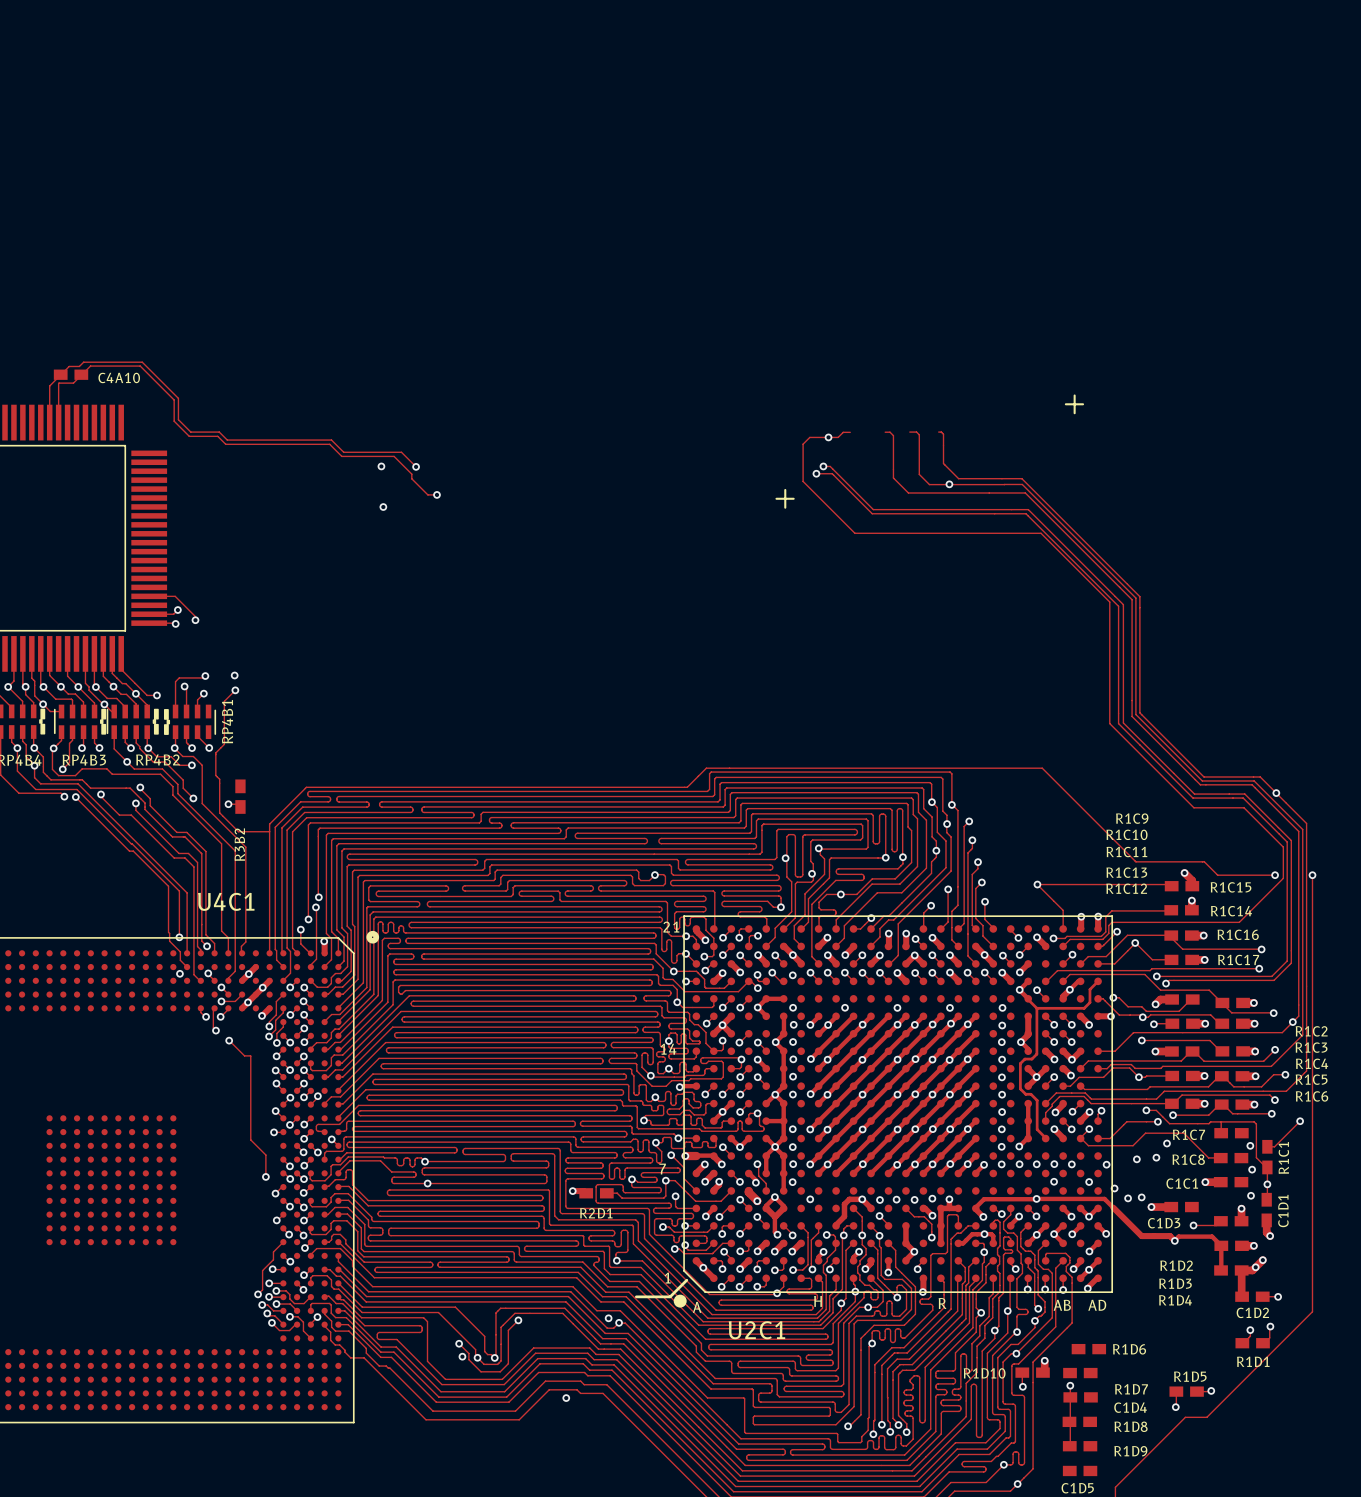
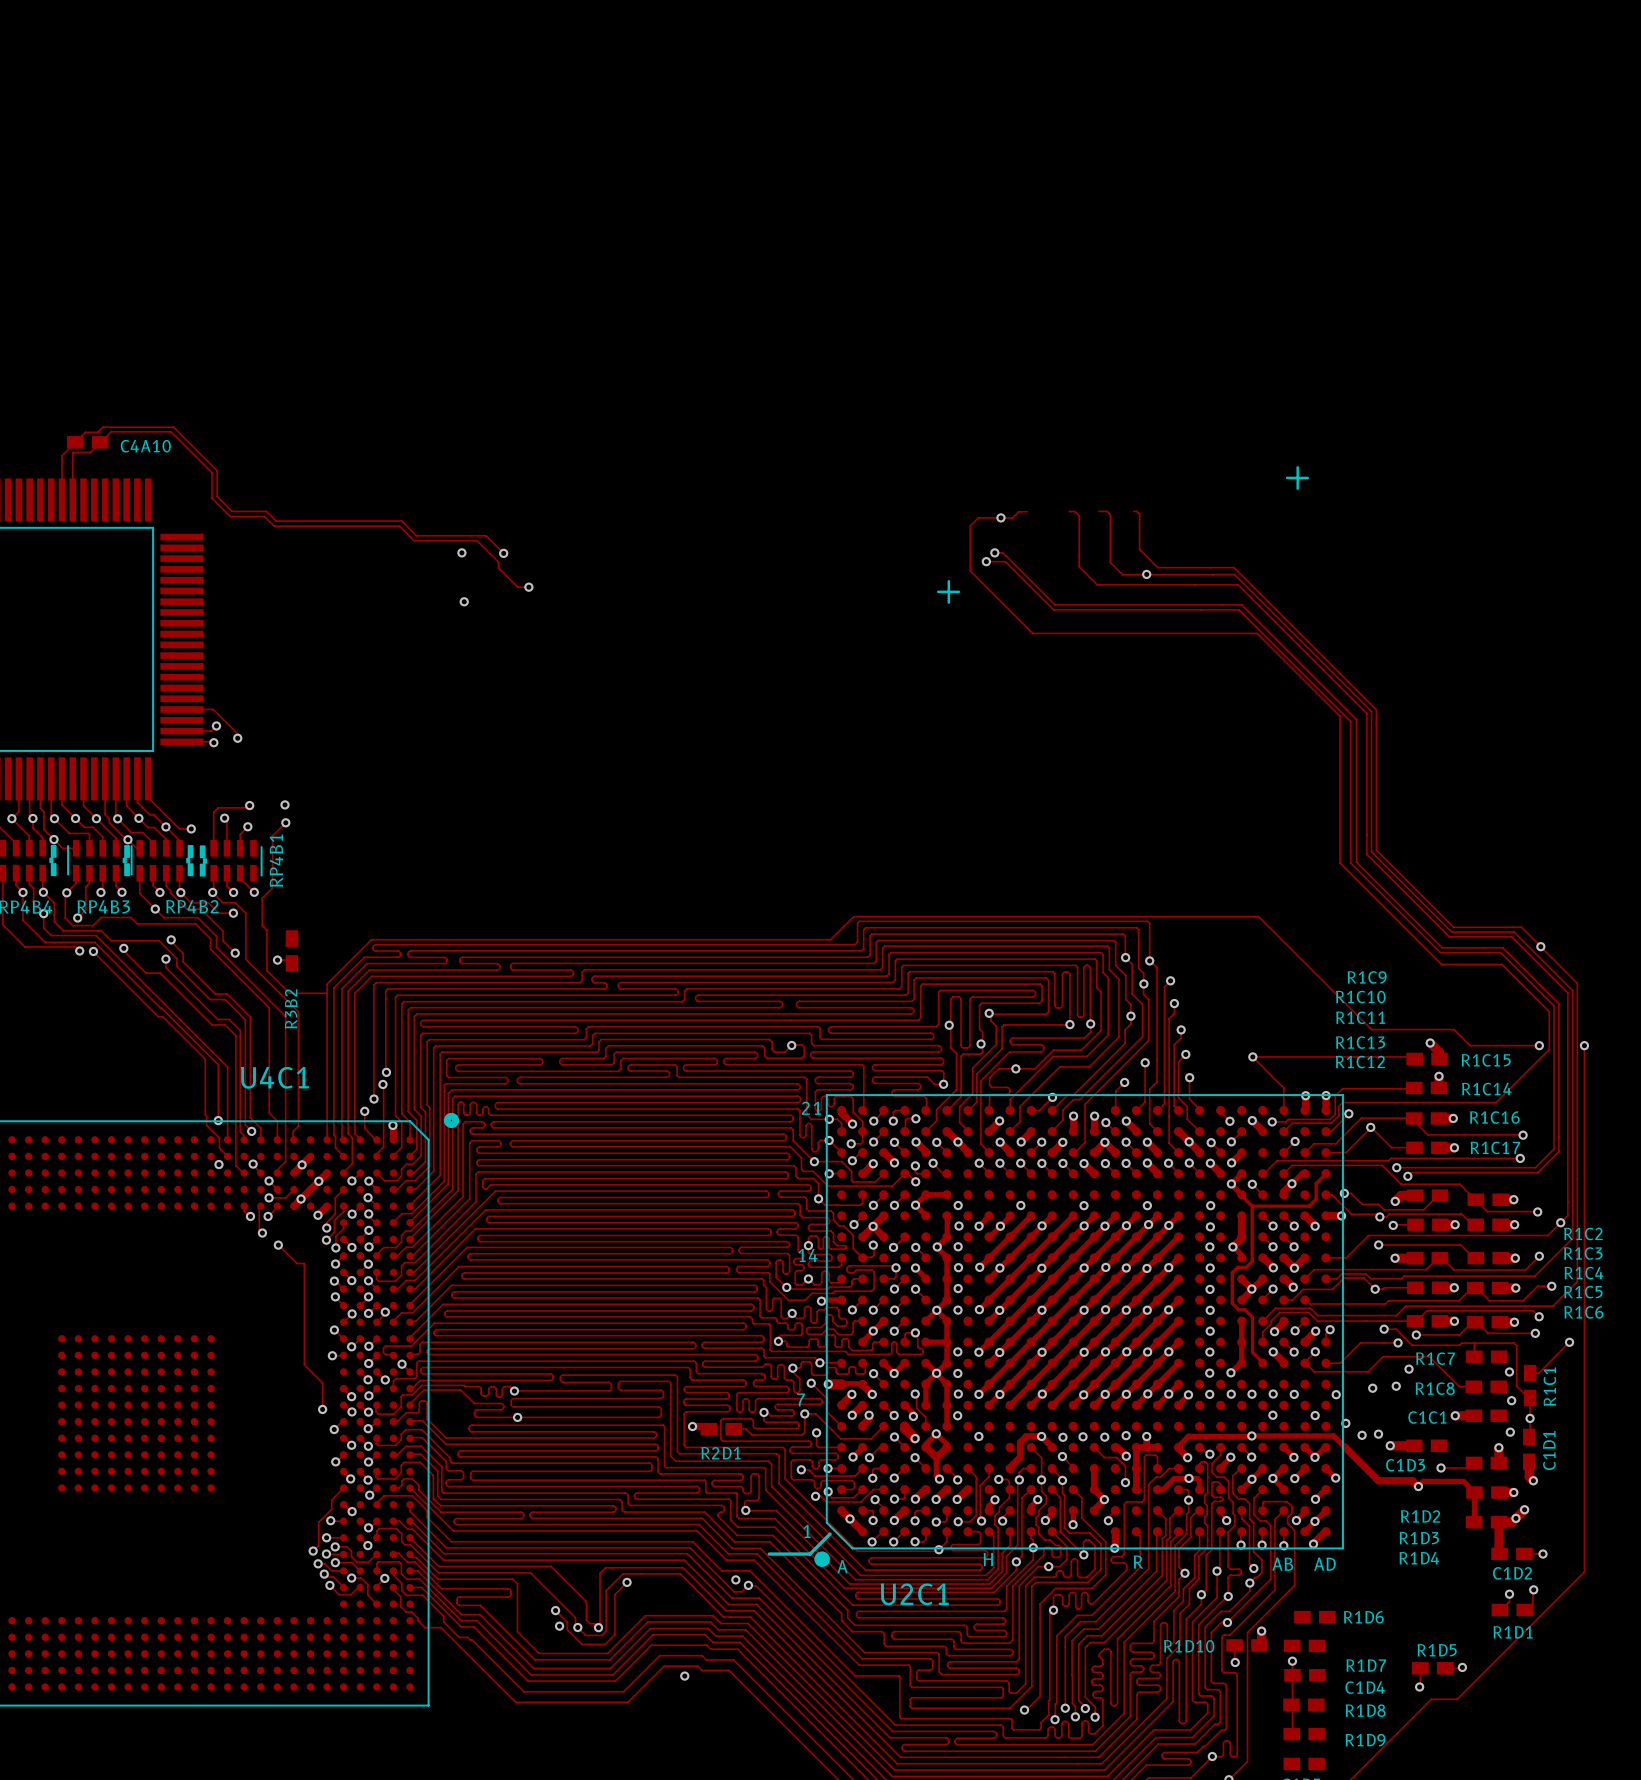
via: (792, 975) -> none

